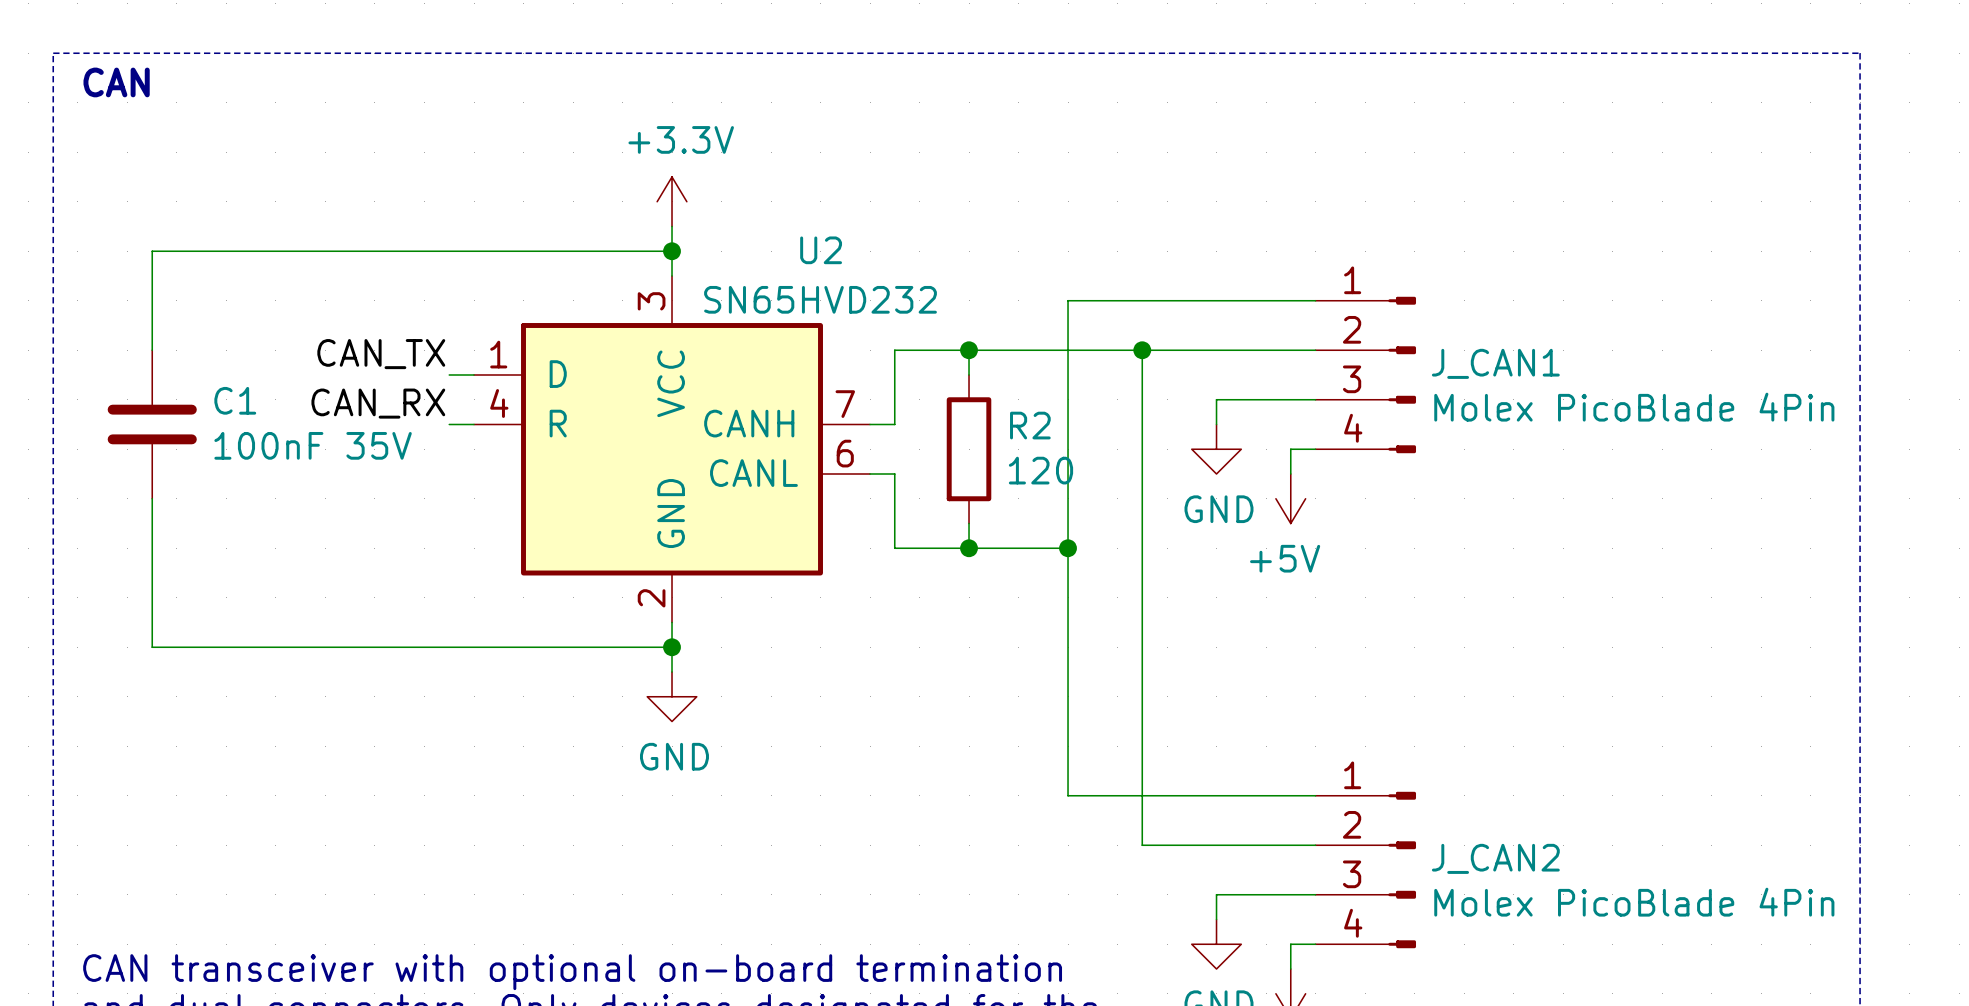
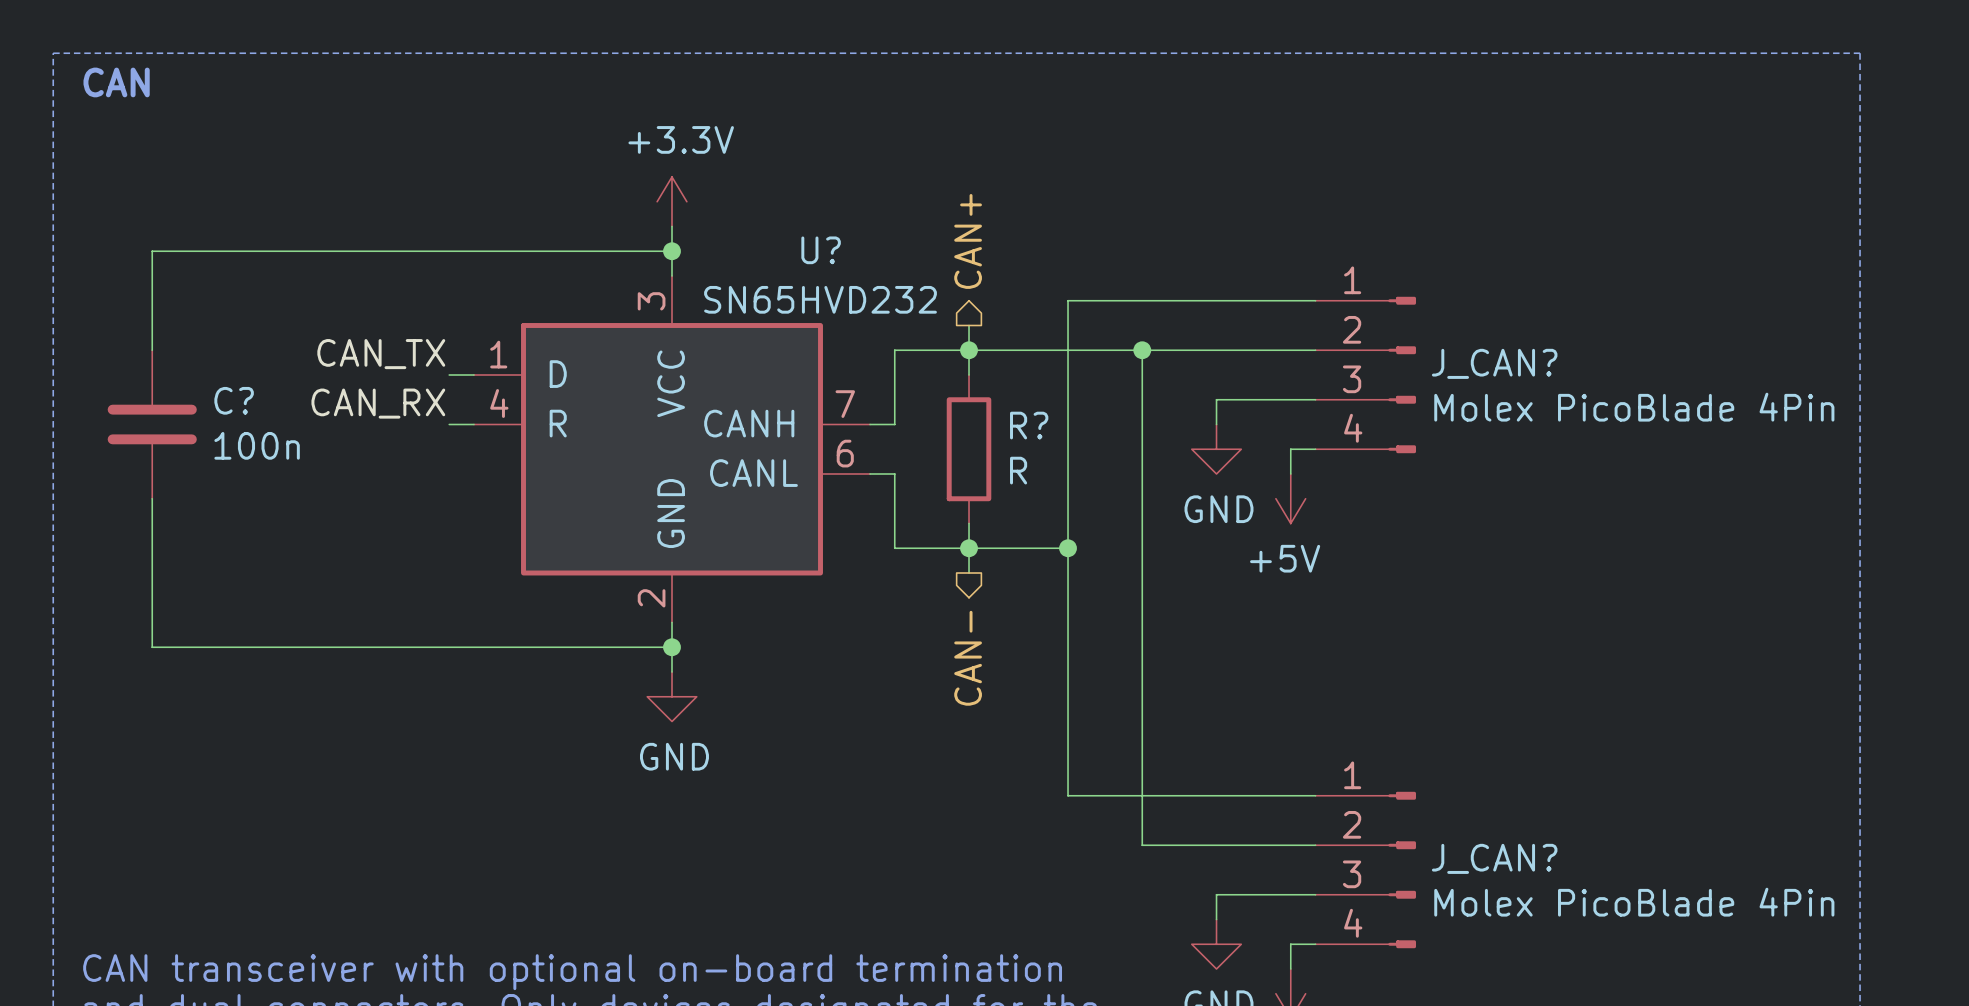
hierarchical label: none -> CAN+ (968, 241)
U2 name: U2 (821, 250) -> U? (821, 250)
wire: none -> (969, 325) (969, 350)
J_CAN1 name: J_CAN1 (1495, 363) -> J_CAN? (1494, 363)
C1 name: C1 (235, 400) -> C? (234, 400)
R2 name: R2 (1030, 425) -> R? (1029, 425)
C1 value: 100nF 35V (313, 445) -> 100n (257, 445)
R2 value: 120 (1040, 470) -> R (1018, 470)
wire: none -> (969, 548) (969, 573)
hierarchical label: none -> CAN- (968, 658)
J_CAN2 name: J_CAN2 (1495, 858) -> J_CAN? (1494, 858)

